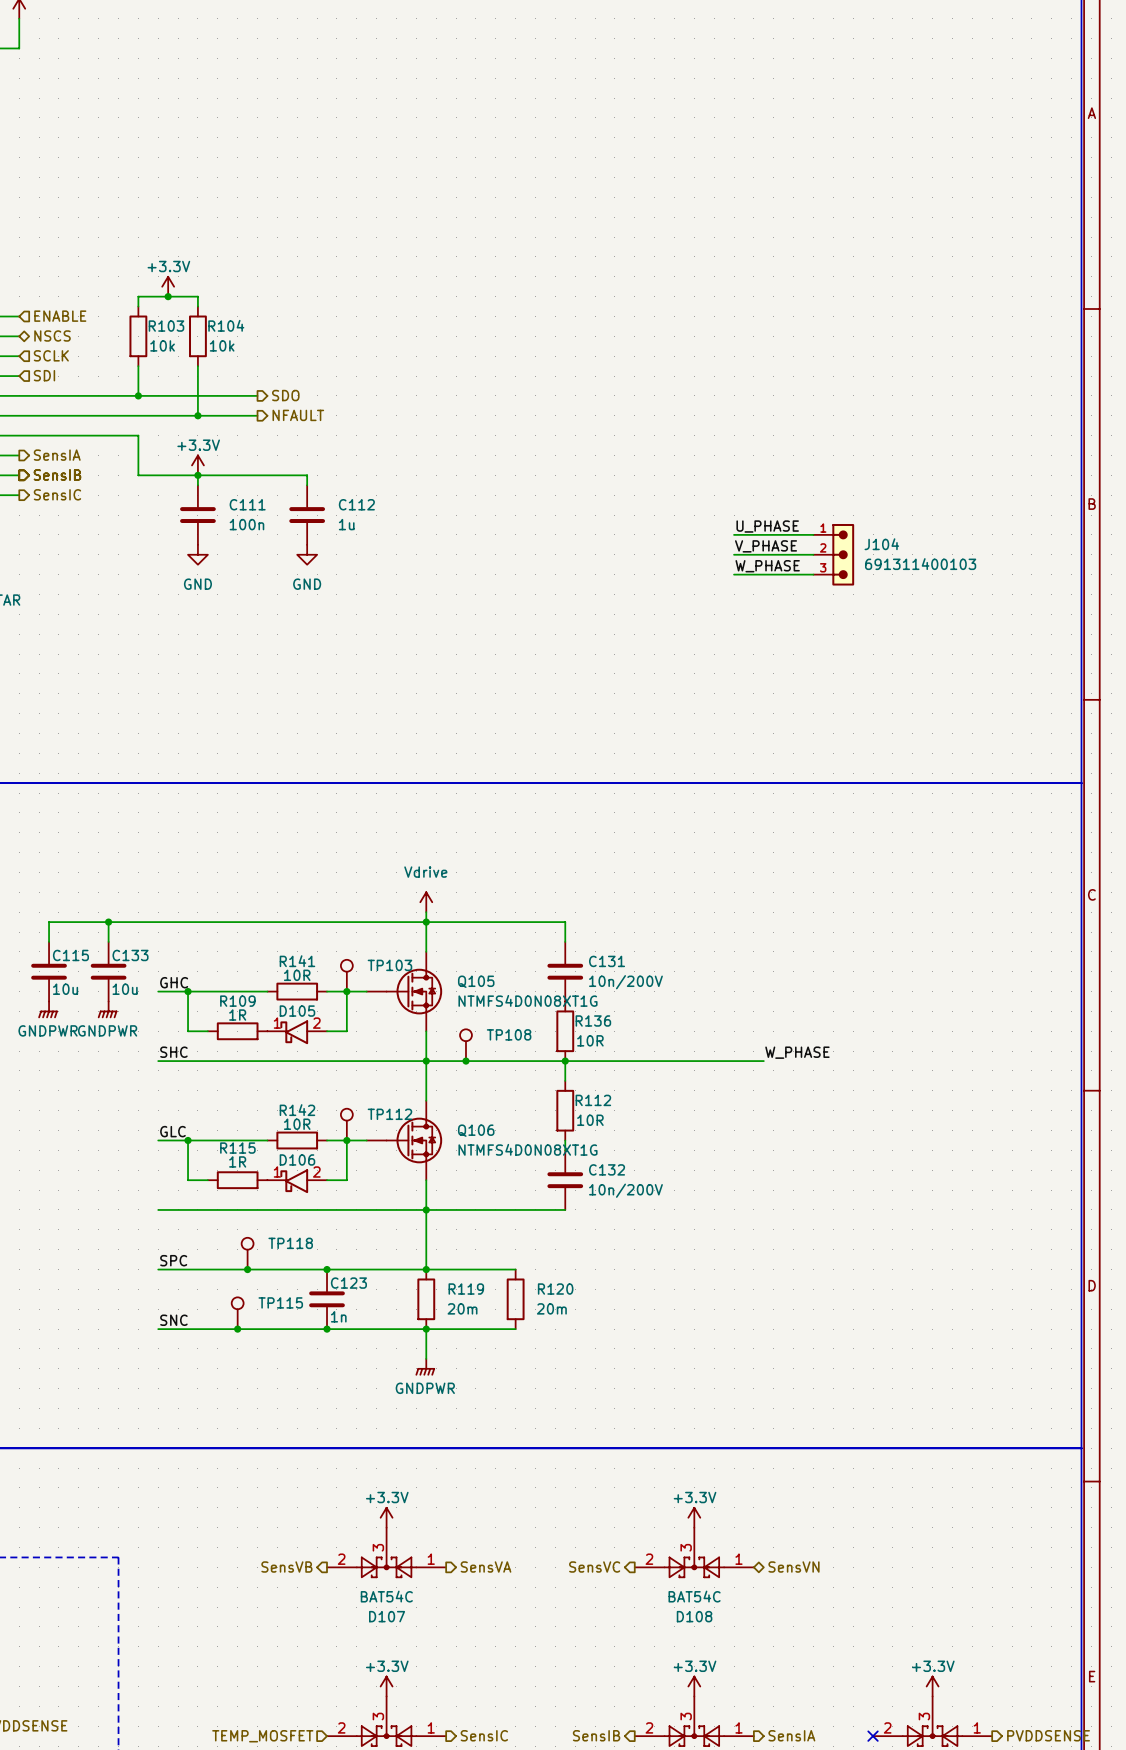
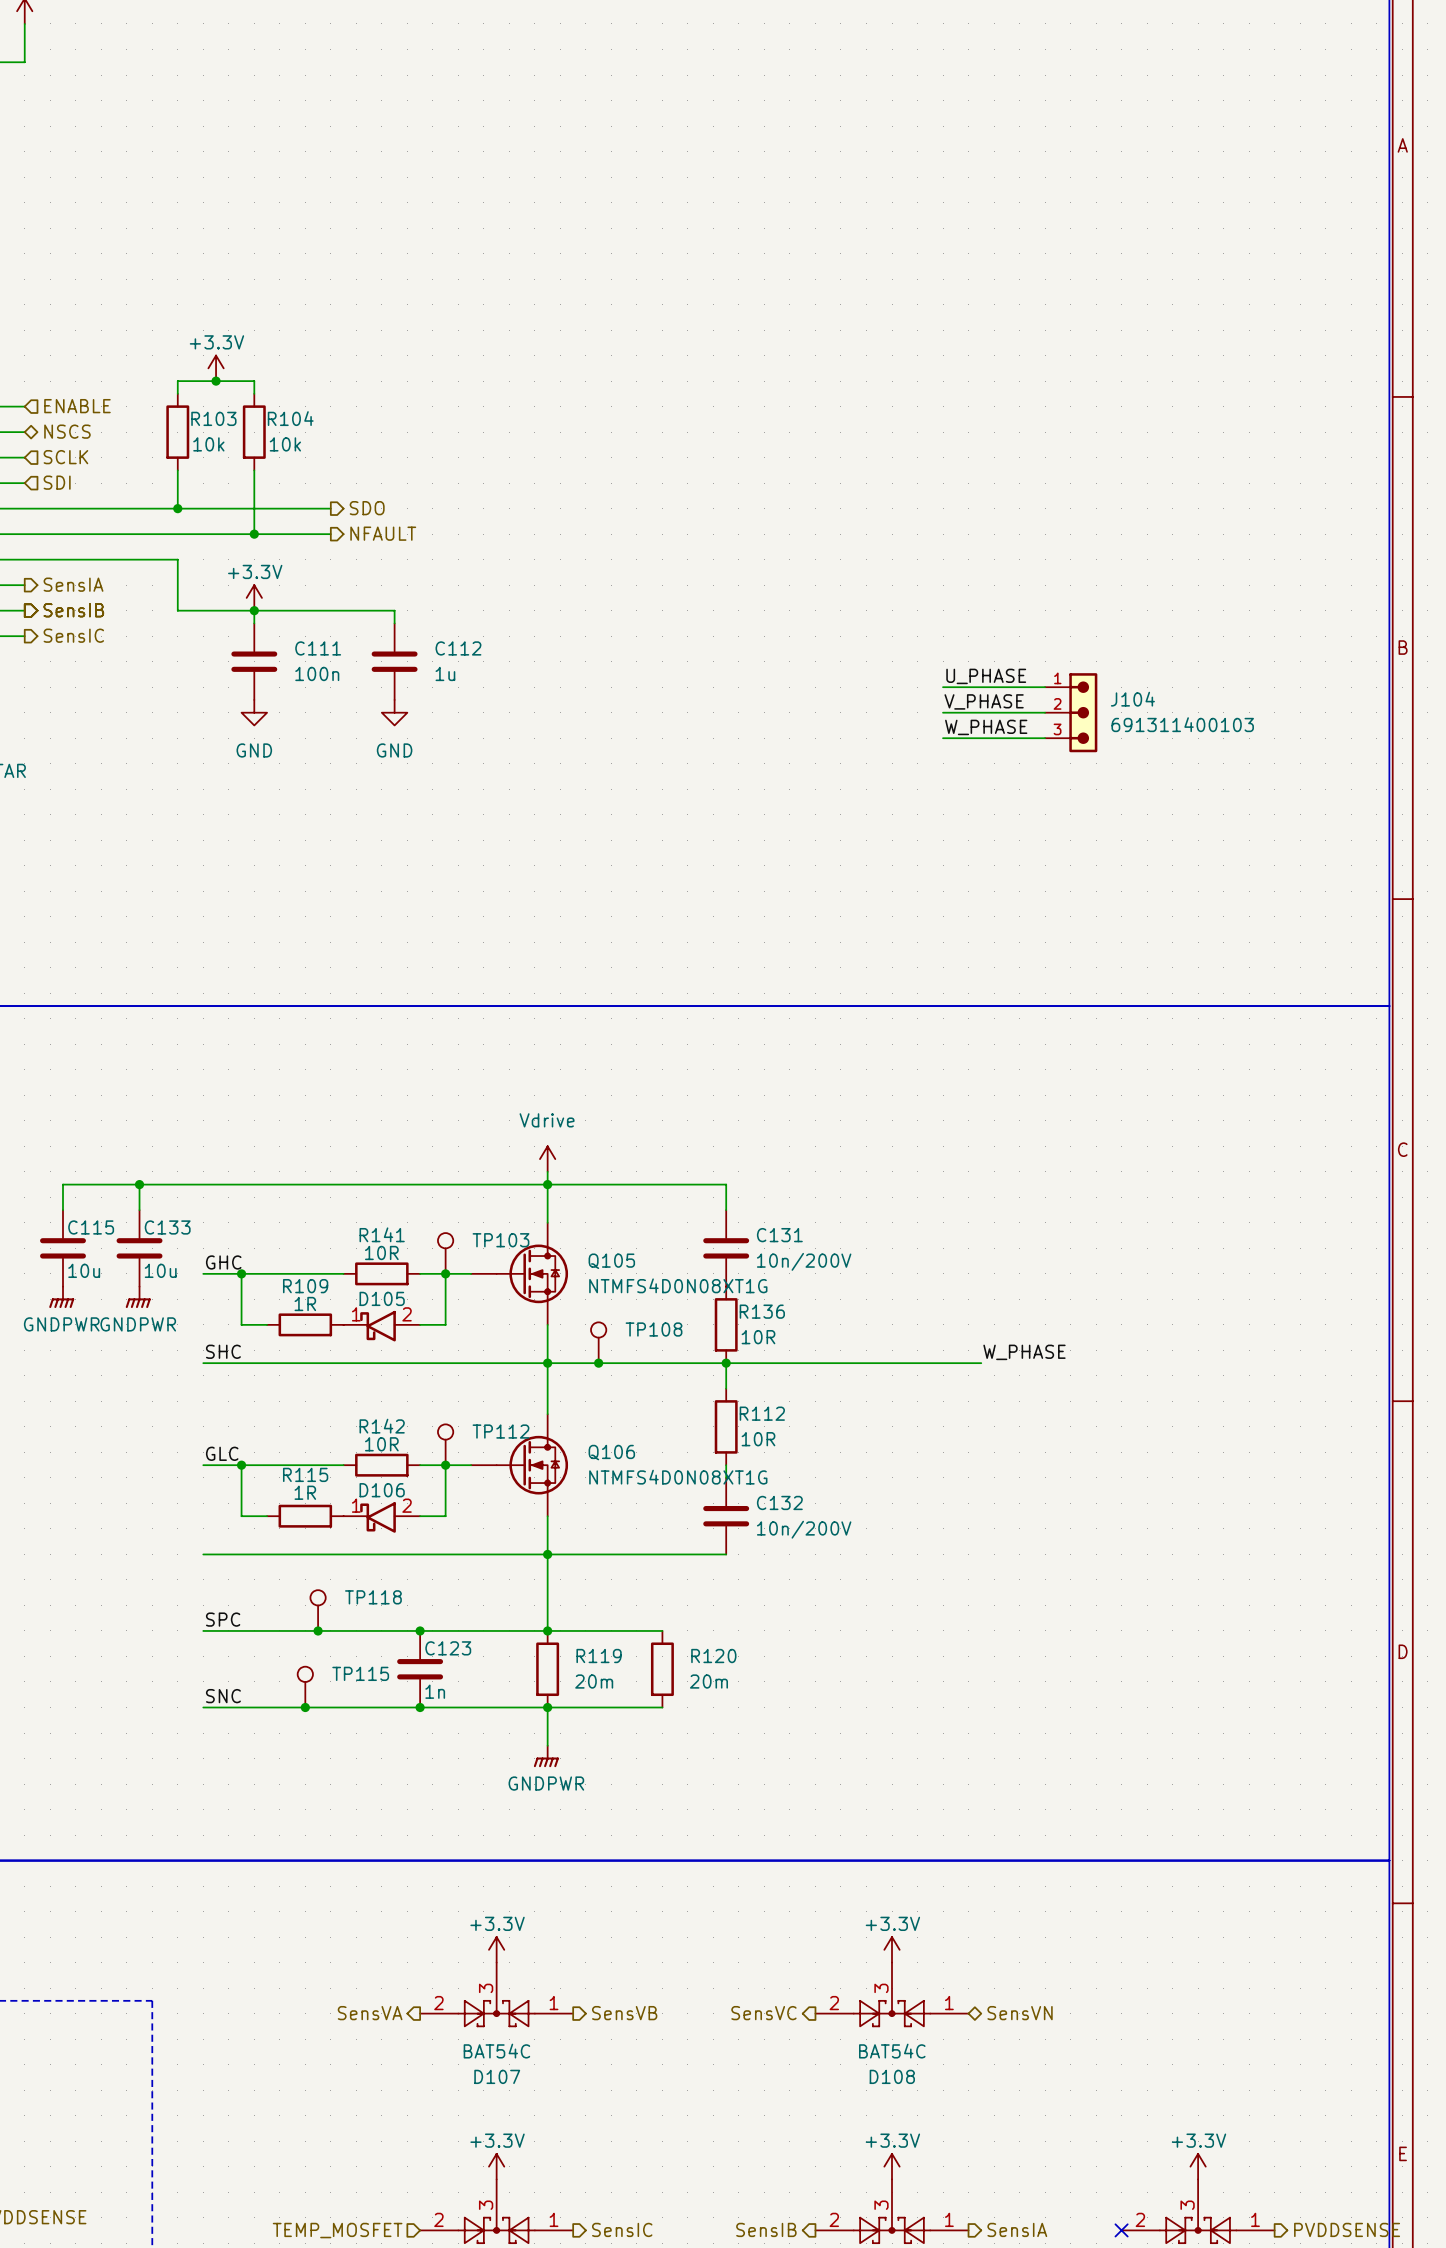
hierarchical label: SensVB (286, 1567) -> SensVA (370, 2013)
hierarchical label: SensVA (486, 1567) -> SensVB (624, 2013)

